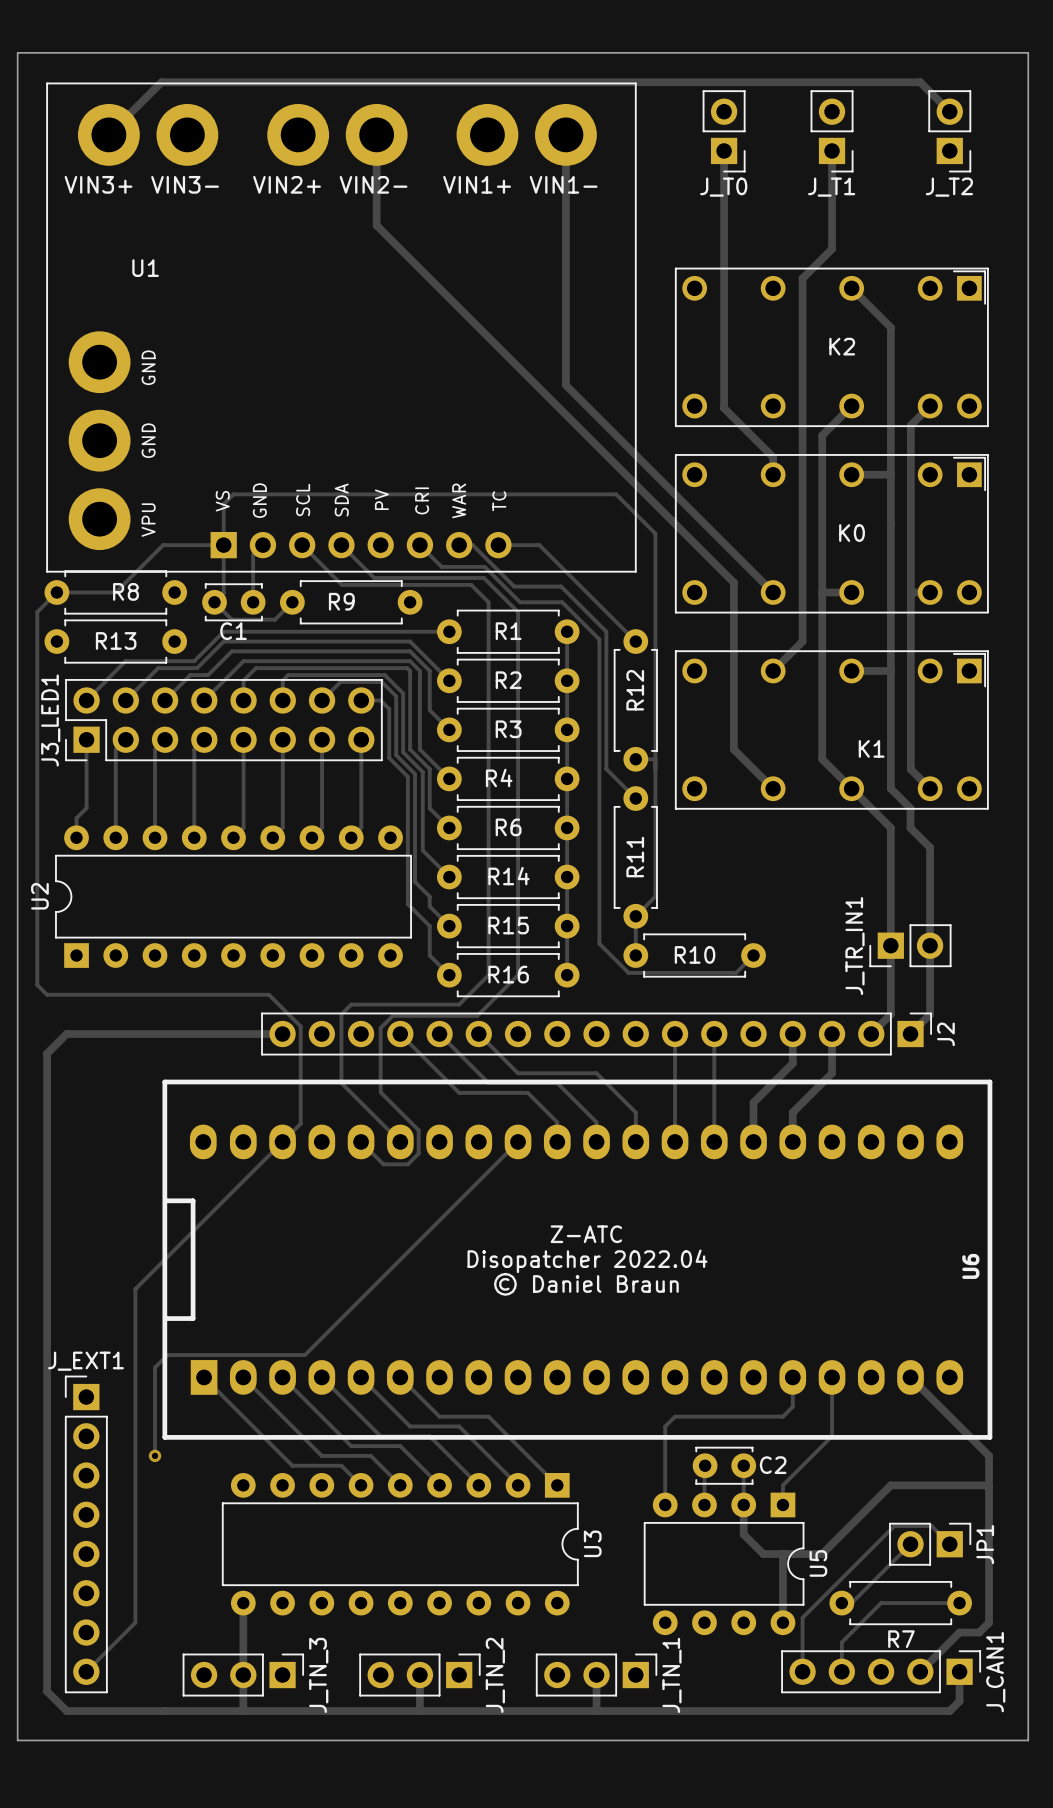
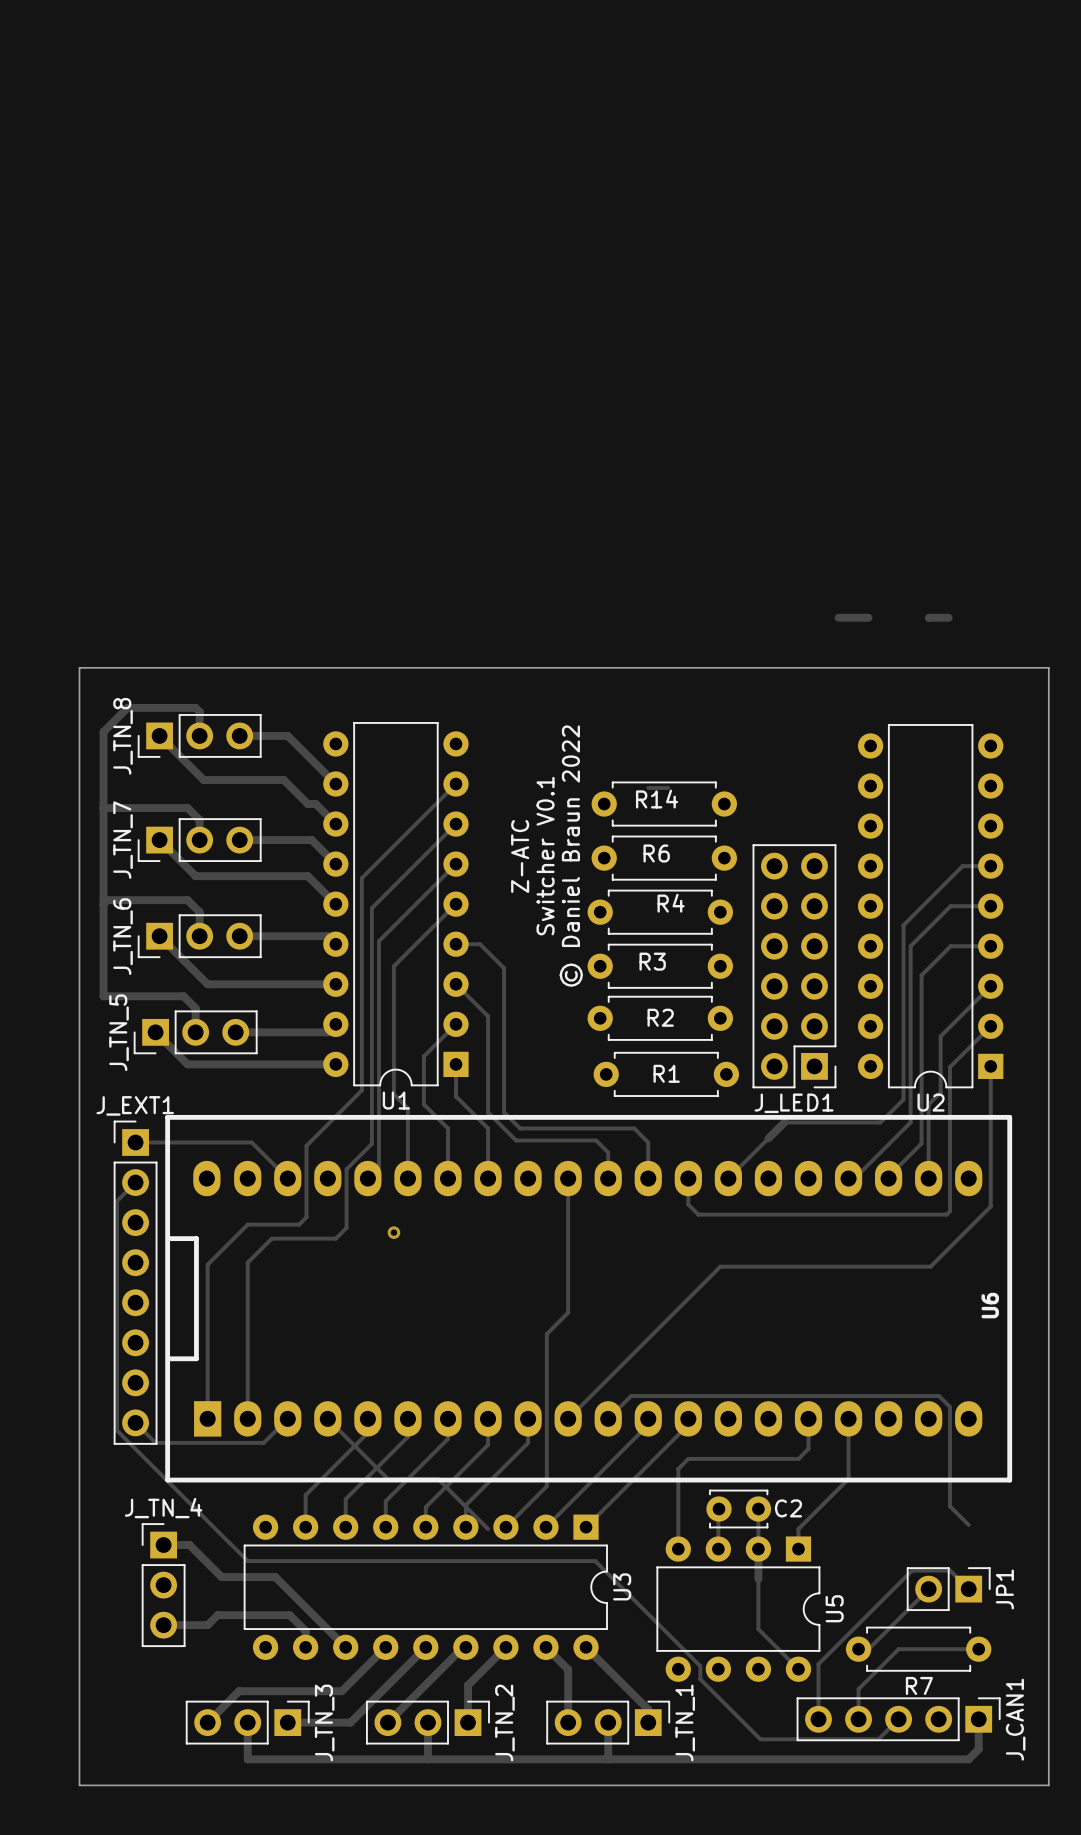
U1 footprint: [46, 82, 637, 573] -> [323, 722, 469, 1087]
track: (949, 111) (920, 82) (161, 82) (108, 134) -> none
J_T0: (724, 131) -> none
J_T1: (832, 131) -> none
J_T2: (949, 131) -> none
track: (376, 134) (376, 225) (733, 582) (733, 749) (773, 788) -> none
track: (565, 134) (565, 385) (773, 592) -> none
track: (724, 150) (724, 408) (773, 457) (773, 474) -> none
track: (832, 150) (832, 249) (802, 278) (802, 641) (773, 670) -> none
U1 name position: U1 (145, 268) -> U1 (396, 1100)
track: (851, 288) (890, 327) (890, 788) (910, 808) (910, 827) (930, 847) (930, 1014) (910, 1034) -> none
K2: (831, 347) -> none
track: (851, 406) (822, 435) (822, 759) (890, 827) (890, 1014) (871, 1034) -> none
track: (930, 406) (910, 425) (910, 769) (930, 788) -> none
track: (851, 474) (890, 474) -> none
K0: (831, 533) -> none
track: (223, 545) (163, 545) (115, 592) (56, 592) (37, 612) (37, 984) (47, 994) (268, 994) (300, 1026) (300, 1123) (135, 1289) (135, 1622) (86, 1671) -> none
track: (262, 545) (253, 554) (253, 602) -> none
track: (302, 545) (341, 584) (471, 584) (488, 602) (488, 975) (459, 1004) (351, 1004) (341, 1014) (341, 1083) (400, 1141) -> (456, 904) (393, 966) (393, 1094) (407, 1108) (407, 1178)
track: (341, 545) (374, 577) (483, 577) (518, 612) (518, 975) (477, 1015) (392, 1015) (380, 1027) (380, 1092) (418, 1130) (418, 1153) (407, 1164) (383, 1164) (361, 1141) -> (456, 864) (378, 941) (378, 1167) (367, 1178)
track: (419, 545) (441, 566) (484, 566) (520, 602) (562, 602) (599, 639) (599, 943) (628, 972) (736, 972) (753, 955) -> none
track: (459, 545) (472, 545) (514, 586) (561, 586) (606, 631) (606, 769) (635, 798) -> none
track: (498, 545) (539, 545) (635, 641) -> none
R8: (115, 592) -> none
C1: (233, 602) -> none
track: (292, 602) (275, 619) (231, 619) (214, 602) (223, 593) (223, 504) (233, 494) (616, 494) (655, 533) (655, 896) (635, 916) (635, 955) -> none
R9: (351, 602) -> none
track: (449, 631) (223, 631) (194, 661) (125, 661) (86, 700) -> none
R1 position: (508, 631) -> (666, 1074)
track: (567, 631) (567, 975) -> none
R13: (115, 641) -> none
board edge: (1028, 641) (1028, 52) (17, 52) (17, 1740) (1028, 1740) (1028, 1736) -> (1048, 667) (79, 667) (79, 1785) (1048, 1785)
track: (851, 670) (890, 670) -> none
track: (449, 680) (410, 641) (223, 641) (197, 668) (158, 668) (125, 700) -> none
R2 position: (508, 680) -> (660, 1018)
track: (165, 700) (190, 675) (208, 675) (231, 651) (410, 651) (429, 670) (429, 710) (449, 729) -> none
track: (204, 700) (243, 661) (410, 661) (419, 671) (419, 749) (449, 778) -> none
track: (243, 700) (243, 680) (256, 668) (407, 668) (410, 671) (410, 749) (429, 769) (429, 808) (449, 827) -> none
track: (282, 700) (282, 680) (288, 675) (384, 675) (403, 693) (403, 752) (422, 771) (422, 850) (449, 877) -> none
track: (322, 700) (340, 682) (381, 682) (396, 696) (396, 755) (415, 774) (415, 881) (429, 896) (429, 906) (449, 926) -> none
track: (361, 700) (380, 700) (389, 709) (389, 758) (407, 776) (407, 904) (429, 926) (429, 955) (449, 975) -> none
R12: (635, 700) -> none
track: none -> (159, 735) (203, 780) (283, 780) (307, 804) (315, 804) (335, 824)
track: none -> (199, 735) (199, 711) (195, 707) (127, 707) (103, 731) (103, 996) (183, 996) (195, 1008) (195, 1032)
J_TN_8: none -> (199, 735)
track: none -> (239, 735) (287, 735) (335, 784)
J3_LED1: (223, 720) -> none
R3 position: (508, 729) -> (660, 966)
R3 name position: R3 (508, 729) -> R3 (652, 961)
K1: (831, 730) -> none
track: (86, 739) (86, 808) (76, 818) (76, 837) -> none
track: (125, 739) (115, 749) (115, 837) -> none
track: (165, 739) (155, 749) (155, 837) -> none
track: (204, 739) (194, 749) (194, 837) -> none
track: (243, 739) (243, 827) (233, 837) -> none
track: (282, 739) (282, 827) (272, 837) -> none
track: (322, 739) (322, 827) (312, 837) -> none
track: (361, 739) (361, 827) (351, 837) -> none
R4 name position: R4 (499, 777) -> R4 (671, 903)
track: none -> (103, 808) (187, 808) (199, 820) (199, 840)
R4 position: (508, 778) -> (660, 912)
track: none -> (159, 840) (195, 876) (307, 876) (335, 904)
J_TN_7: none -> (199, 840)
track: none -> (239, 840) (311, 840) (335, 864)
text: none -> Z-ATC (520, 856)
text: none -> Switcher V0.1 (545, 856)
text: none -> © Daniel Braun 2022 (571, 856)
R6 position: (508, 827) -> (664, 858)
R6 name position: R6 (508, 827) -> R6 (656, 853)
R11: (635, 857) -> none
track: none -> (103, 904) (107, 900) (187, 900) (199, 912) (199, 936)
track: none -> (990, 906) (950, 906) (910, 946) (910, 1122) (854, 1178) (848, 1178)
R14 name position: R14 (508, 876) -> R14 (657, 799)
R14 position: (508, 877) -> (664, 804)
U2 rotation: 0° (233, 896) -> 90° counterclockwise (930, 906)
U2 position: (233, 896) -> (930, 906)
track: none -> (159, 936) (207, 984) (335, 984)
J_TN_6: none -> (199, 936)
track: none -> (239, 936) (327, 936) (335, 944)
track: none -> (990, 946) (950, 946) (921, 975) (921, 1143) (888, 1178)
R15: (508, 926) -> none
J_LED1: none -> (794, 966)
J_TR_IN1: (910, 945) -> none
track: none -> (990, 986) (940, 1036) (940, 1092) (928, 1104) (928, 1178)
R10: (694, 955) -> none
R16: (508, 975) -> none
track: none -> (335, 1024) (327, 1032) (235, 1032)
track: none -> (456, 1024) (423, 1056) (423, 1104) (448, 1128) (448, 1178)
track: none -> (155, 1032) (187, 1064) (335, 1064)
J_TN_5: none -> (195, 1032)
track: none -> (456, 1064) (456, 1096) (488, 1128) (488, 1178)
track: none -> (990, 1066) (990, 1206) (930, 1266) (720, 1266) (568, 1418)
track: (282, 1034) (66, 1034) (47, 1053) (47, 1691) (66, 1711) (243, 1711) -> none
track: (400, 1034) (459, 1092) (510, 1092) -> (456, 944) (480, 944) (504, 968) (504, 1112) (520, 1128)
track: (439, 1034) (488, 1083) (557, 1083) (596, 1122) -> (456, 984) (488, 1016) (488, 1112) (516, 1140) (596, 1140) (608, 1152) (608, 1158)
track: (478, 1034) (518, 1073) (596, 1073) (635, 1112) -> (538, 1128) (634, 1128) (648, 1142) (648, 1148)
J2: (596, 1034) -> none
track: (675, 1034) (675, 1141) -> (990, 1026) (949, 1067) (949, 1211) (946, 1214) (698, 1214) (688, 1204) (688, 1178)
track: (714, 1034) (714, 1141) -> none
track: (792, 1034) (792, 1063) (769, 1087) -> (990, 866) (962, 866) (903, 925) (903, 1099) (880, 1122) (784, 1122)
track: (832, 1034) (832, 1073) (792, 1112) (792, 1141) -> none
track: (527, 1092) (557, 1122) (557, 1141) -> (505, 1527) (546, 1486) (546, 1334) (568, 1312) (568, 1178)
track: (753, 1102) (753, 1141) -> (768, 1138) (728, 1178)
track: none -> (135, 1142) (251, 1142) (287, 1178)
track: (518, 1141) (304, 1355) (167, 1355) (155, 1367) (155, 1455) -> none
track: none -> (135, 1182) (117, 1201) (117, 1430) (229, 1543)
via: none -> (393, 1232)
text: Z-ATC (586, 1234) -> none
text: Disopatcher 2022.04 (587, 1261) -> none
text: © Daniel Braun (586, 1284) -> none
track: (204, 1377) (292, 1465) (341, 1465) (361, 1485) -> (207, 1418) (207, 1264) (247, 1224) (299, 1224) (306, 1217) (306, 1145) (361, 1090) (361, 878) (456, 784)
track: (243, 1377) (321, 1455) (370, 1455) (400, 1485) -> (247, 1418) (247, 1262) (271, 1238) (335, 1238) (346, 1227) (346, 1169) (371, 1143) (371, 908) (456, 824)
track: (282, 1377) (351, 1446) (400, 1446) (439, 1485) -> (287, 1418) (263, 1442) (155, 1442) (135, 1422)
track: (361, 1377) (410, 1426) (459, 1426) (518, 1485) -> (367, 1418) (367, 1432) (305, 1495) (305, 1527)
track: (400, 1377) (439, 1416) (488, 1416) (557, 1485) -> (407, 1418) (407, 1436) (345, 1499) (345, 1527)
track: none -> (448, 1418) (448, 1438) (385, 1501) (385, 1527)
track: none -> (488, 1418) (488, 1444) (425, 1507) (425, 1527)
track: none -> (528, 1418) (528, 1442) (465, 1505) (465, 1527)
track: none -> (608, 1418) (631, 1396) (939, 1396) (949, 1406) (949, 1506) (968, 1525)
track: none -> (648, 1418) (648, 1424) (545, 1527)
track: none -> (688, 1418) (688, 1424) (586, 1527)
track: (910, 1377) (989, 1455) (989, 1622) (979, 1632) (959, 1632) (920, 1671) -> none
via: (155, 1455) -> none
track: (989, 1485) (890, 1485) (822, 1554) (763, 1554) (743, 1534) -> none
track: none -> (229, 1543) (247, 1561) (595, 1561) (700, 1666) (700, 1679) (760, 1739) (878, 1739) (898, 1719)
track: none -> (163, 1545) (189, 1545) (221, 1577) (275, 1577) (345, 1647)
J_EXT1 position: (86, 1534) -> (135, 1282)
J_TN_4: none -> (163, 1585)
U3 position: (400, 1544) -> (425, 1587)
track: (782, 1554) (782, 1622) -> (758, 1579) (758, 1629) (798, 1669)
track: none -> (163, 1625) (207, 1625) (217, 1615) (289, 1615) (305, 1631) (305, 1647)
track: none -> (385, 1647) (341, 1691) (239, 1691) (207, 1722)
track: none -> (425, 1647) (350, 1722) (287, 1722)
track: none -> (465, 1647) (463, 1647) (387, 1722)
track: none -> (505, 1647) (468, 1685) (468, 1722)
track: none -> (545, 1647) (568, 1669) (568, 1722)
track: none -> (586, 1647) (648, 1709) (648, 1722)
track: (243, 1603) (243, 1675) -> none

